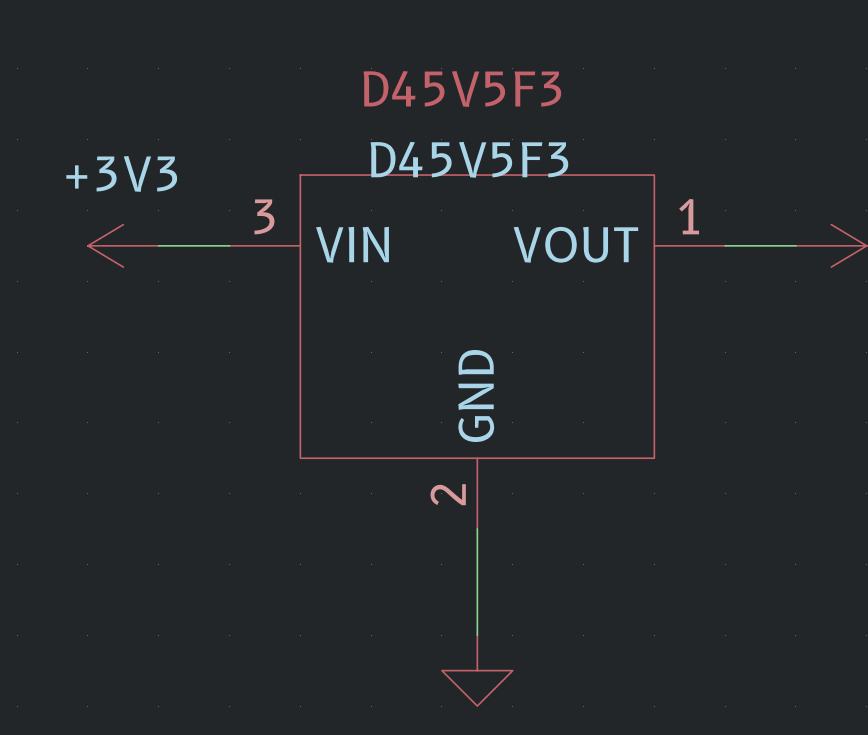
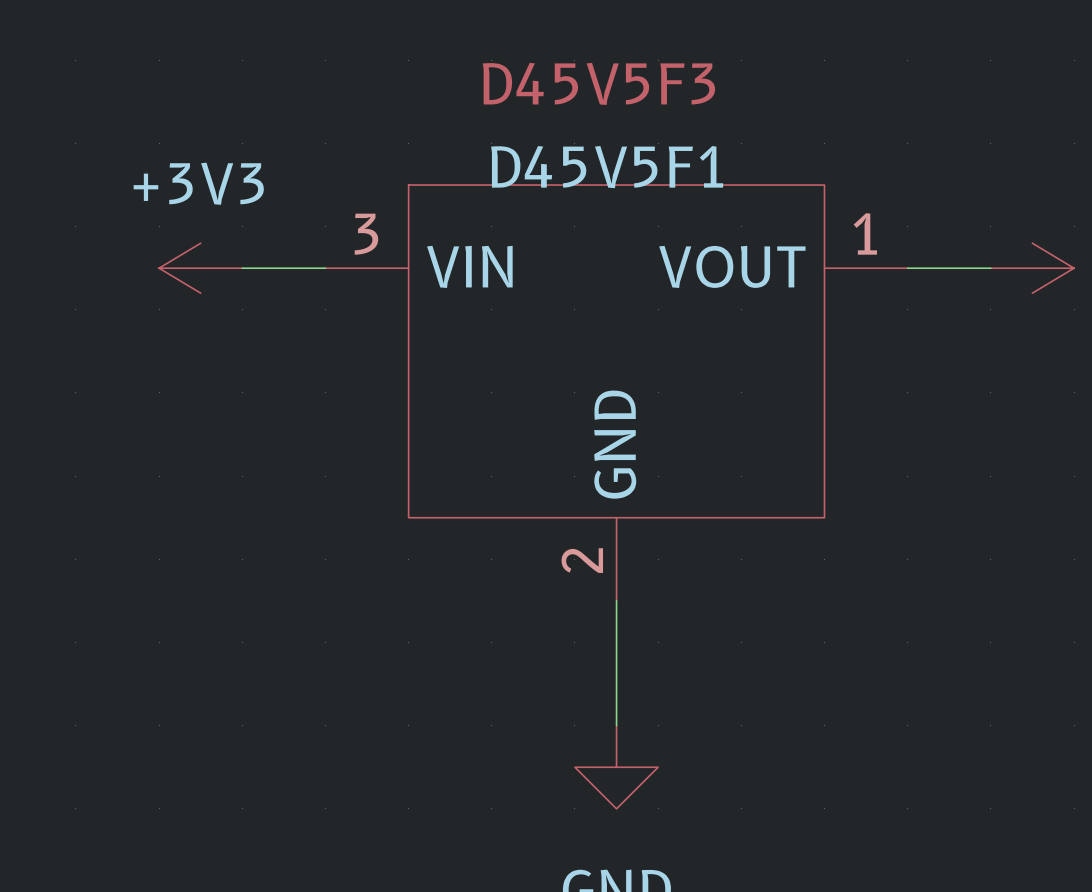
D45V5F3 name: D45V5F3 (469, 159) -> D45V5F1 (607, 167)

